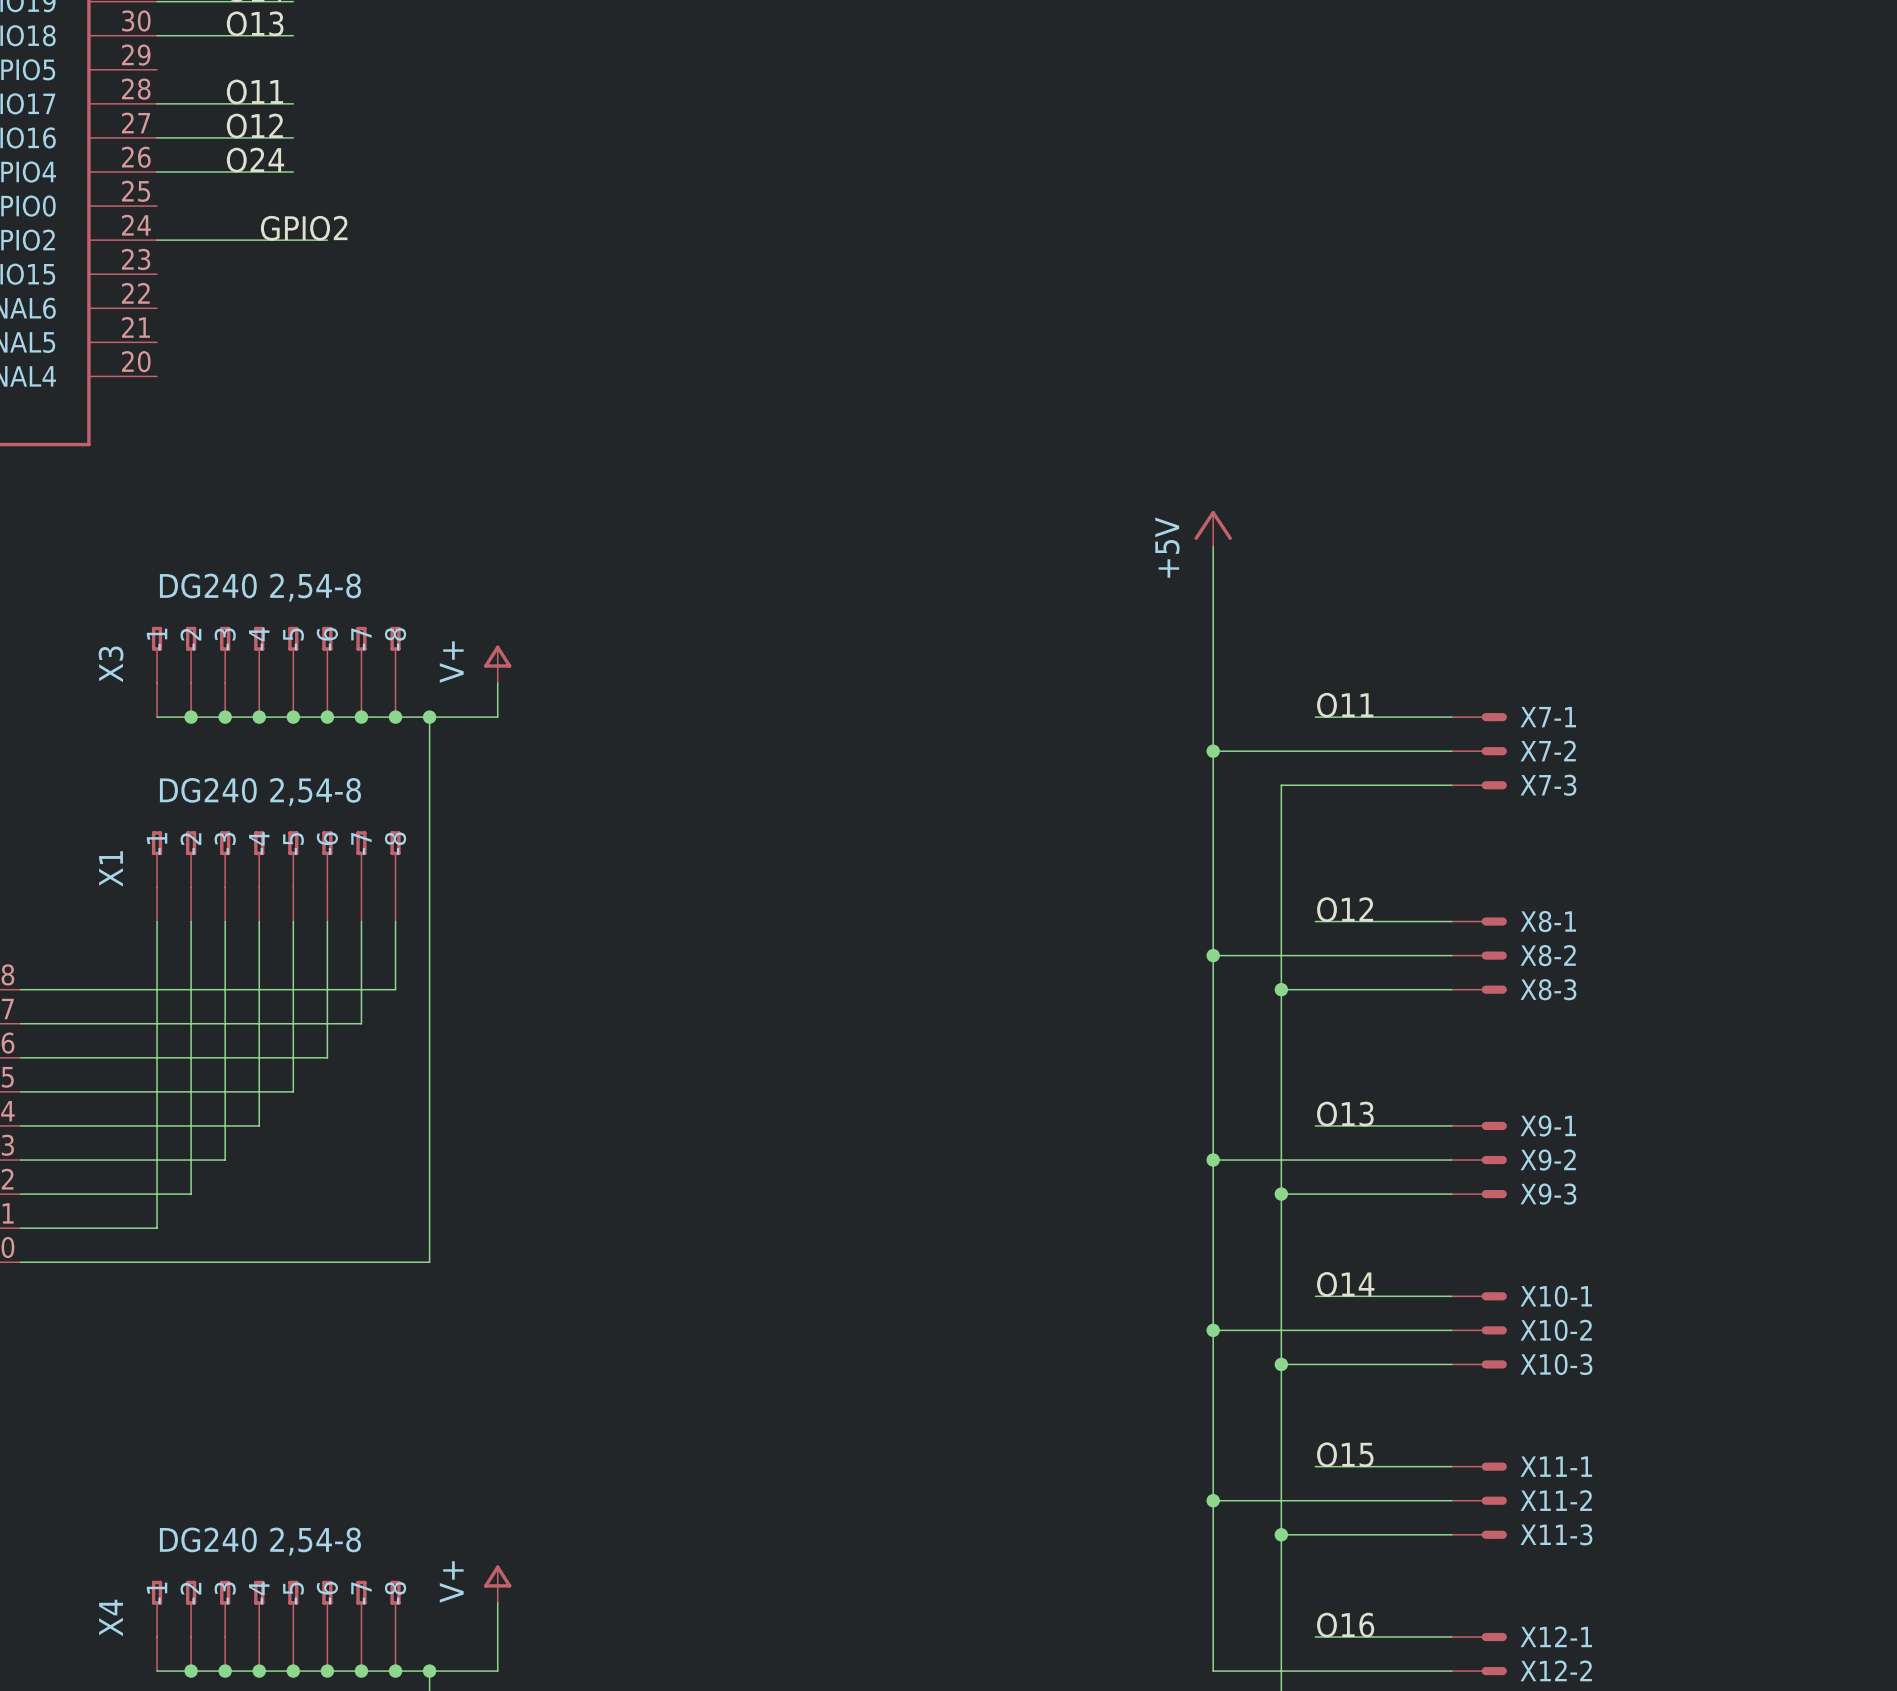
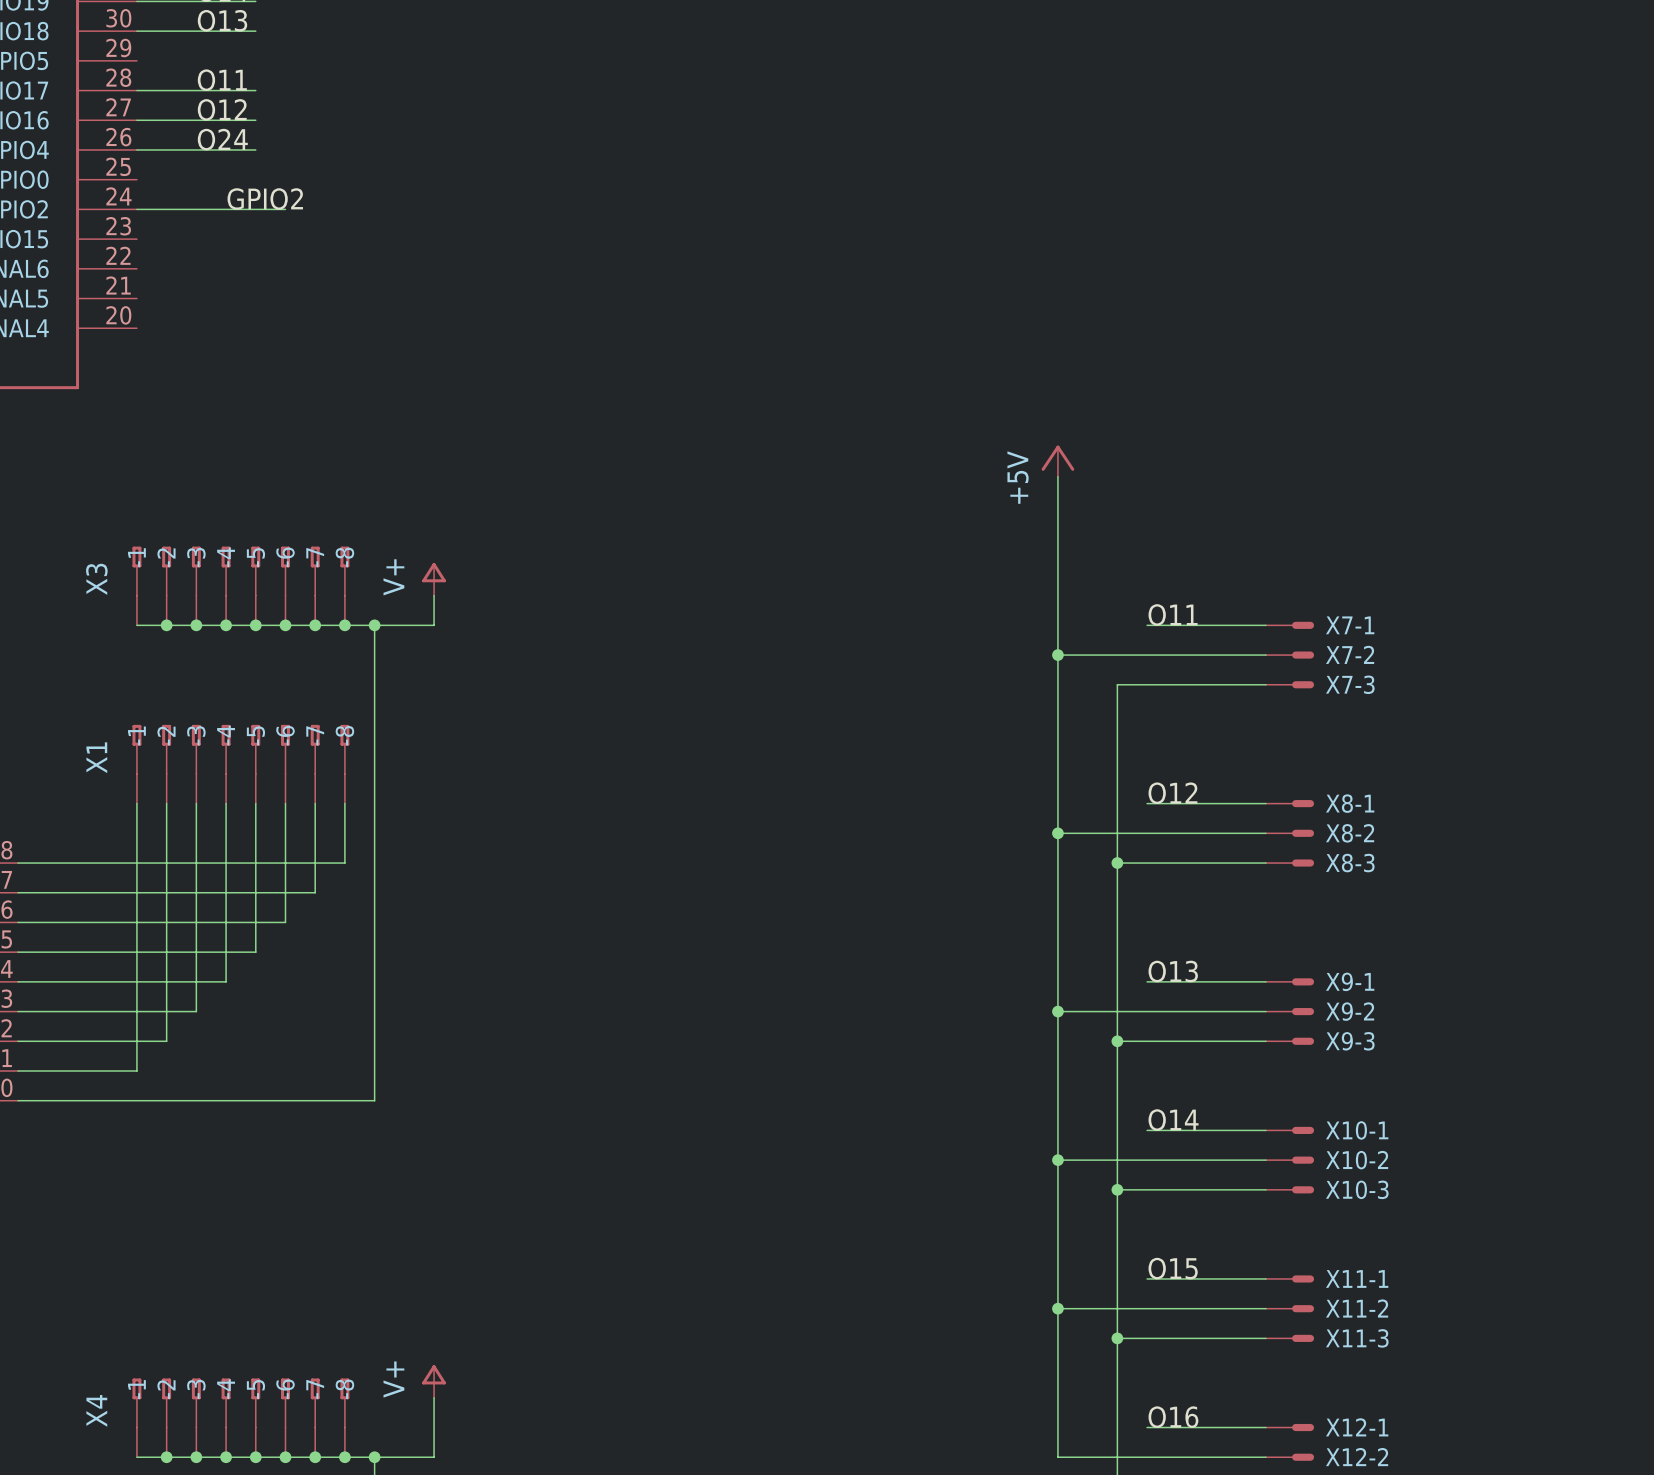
X3 value: DG240 2,54-8 (260, 587) -> none
X1 value: DG240 2,54-8 (260, 792) -> none
X4 value: DG240 2,54-8 (260, 1541) -> none

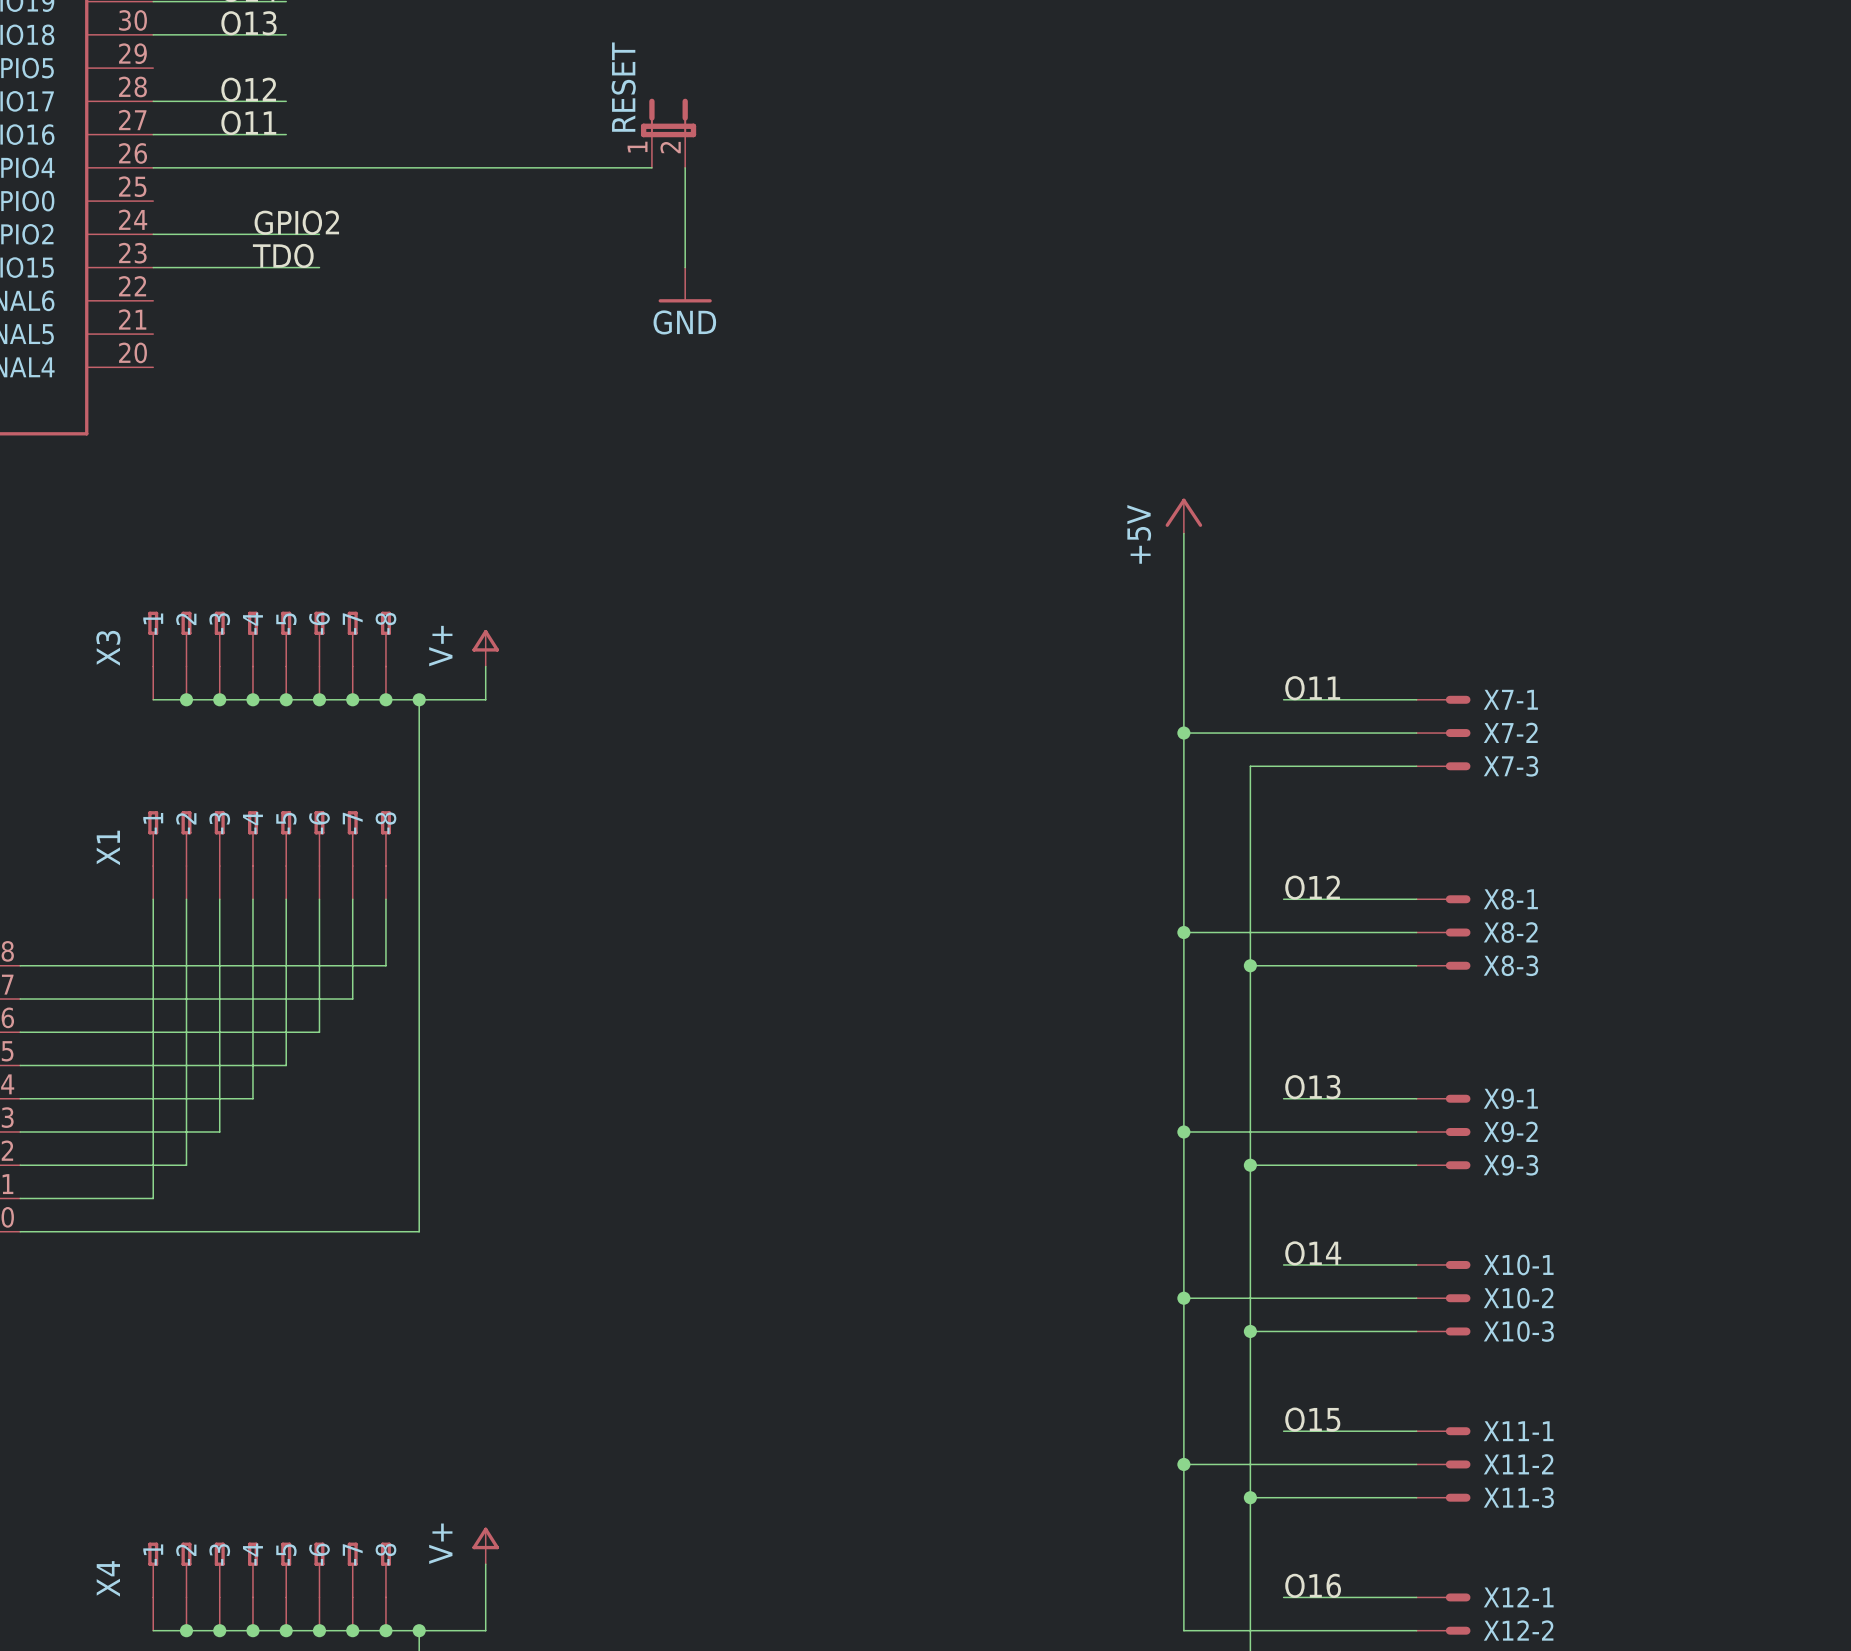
label: O11 (222, 80) -> O12 (248, 89)
label: O12 (222, 109) -> O11 (248, 122)
RESET: none -> (668, 133)
label: O24 (222, 139) -> none
wire: none -> (286, 167) (651, 167)
wire: none -> (685, 167) (685, 267)
label: none -> TDO (283, 255)
wire: none -> (153, 267) (319, 267)
power symbol: none -> GND (685, 285)

